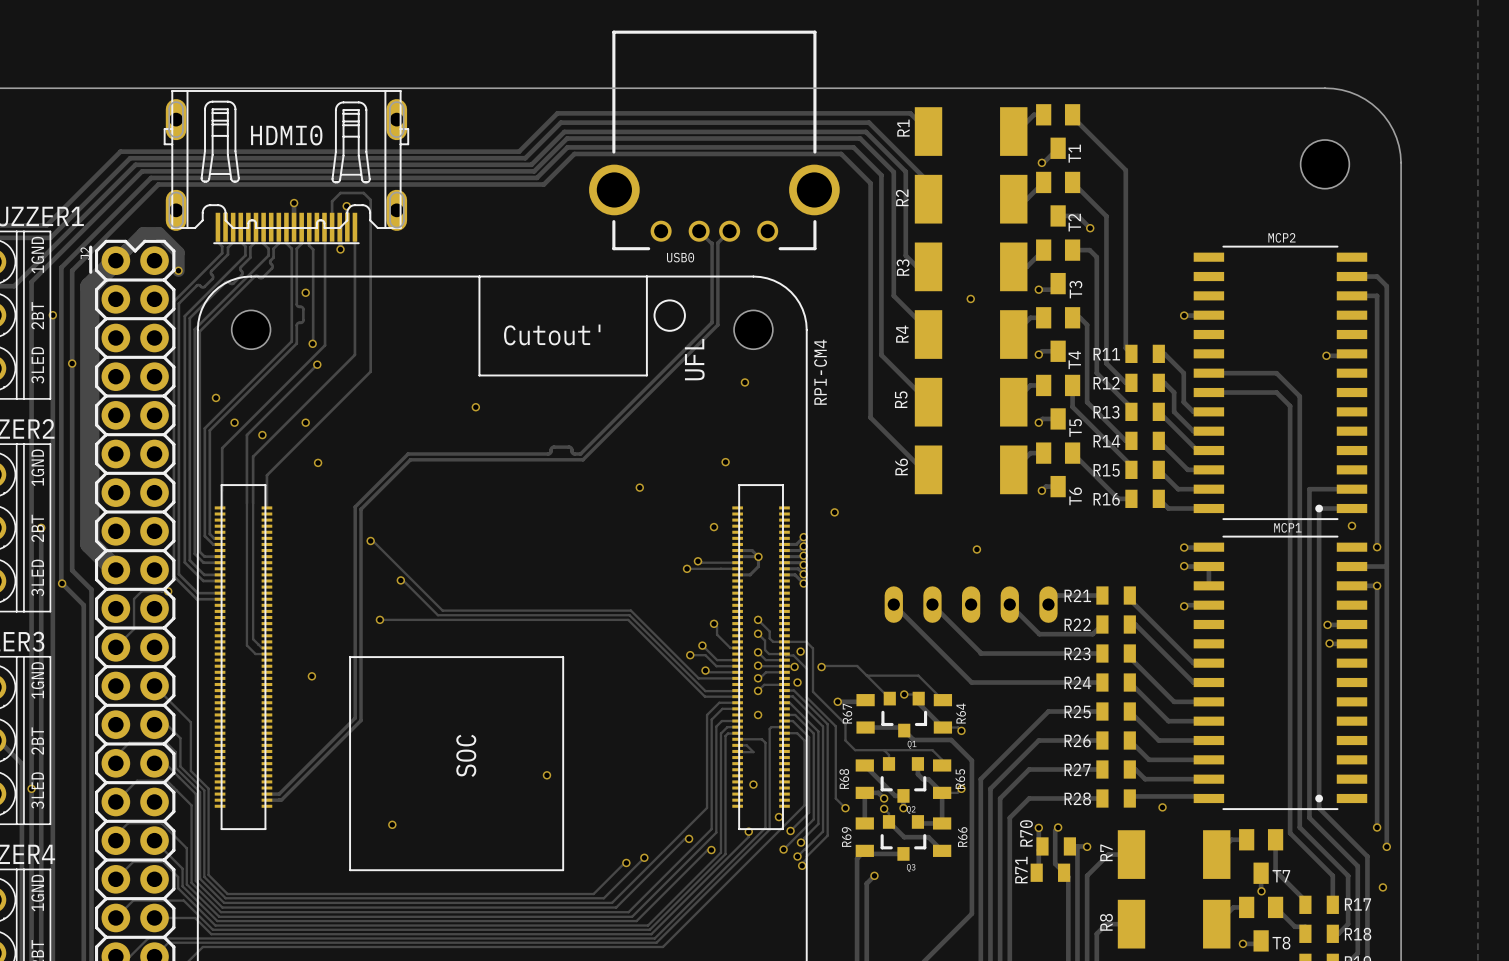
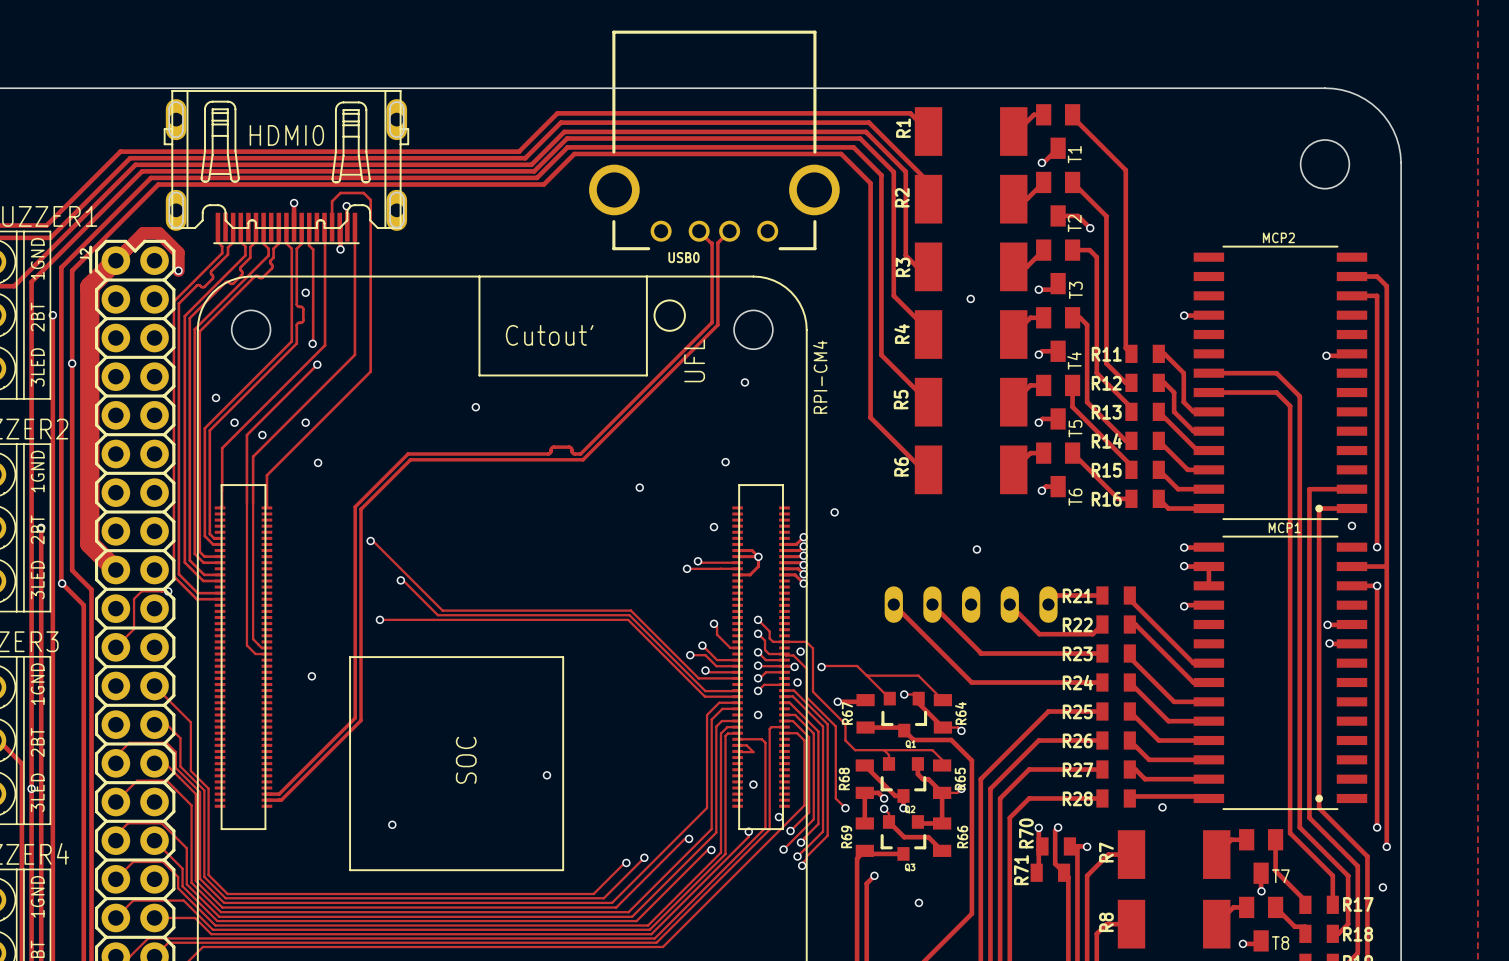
via: none -> (918, 902)

